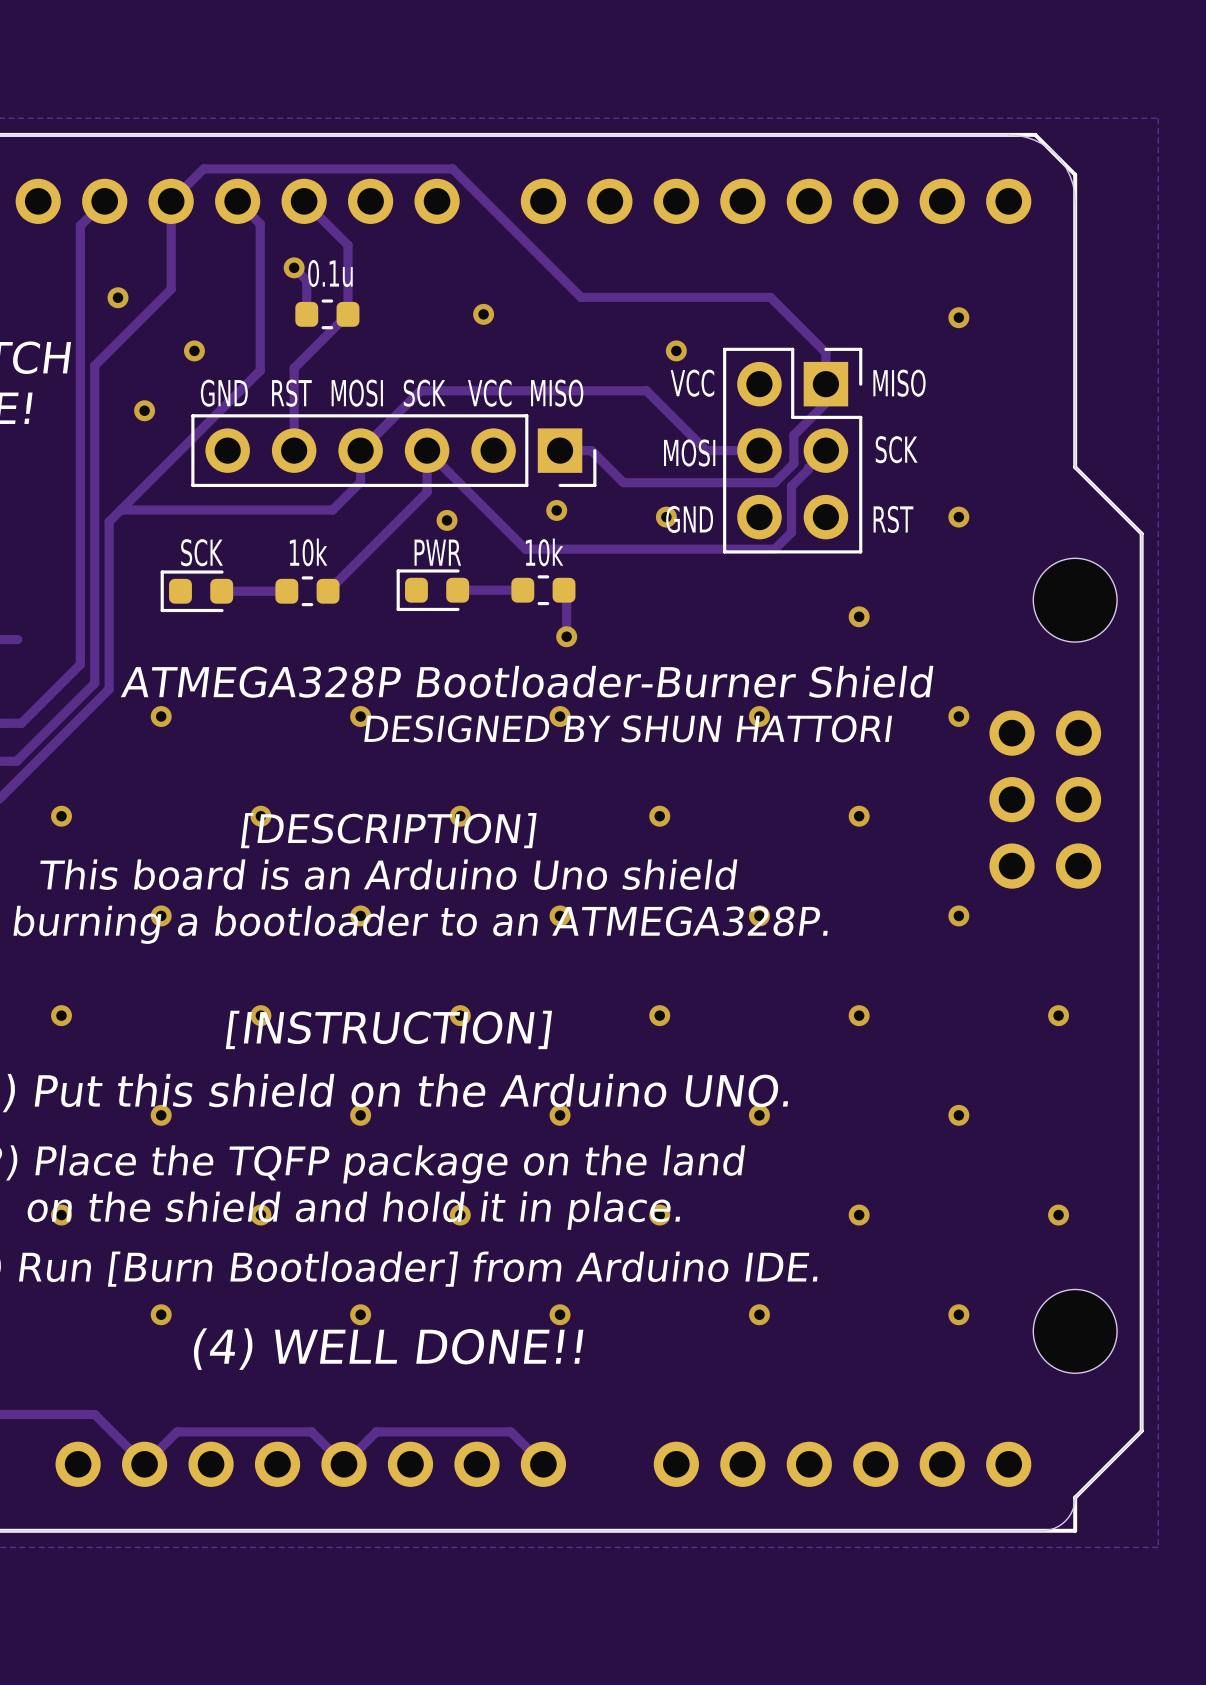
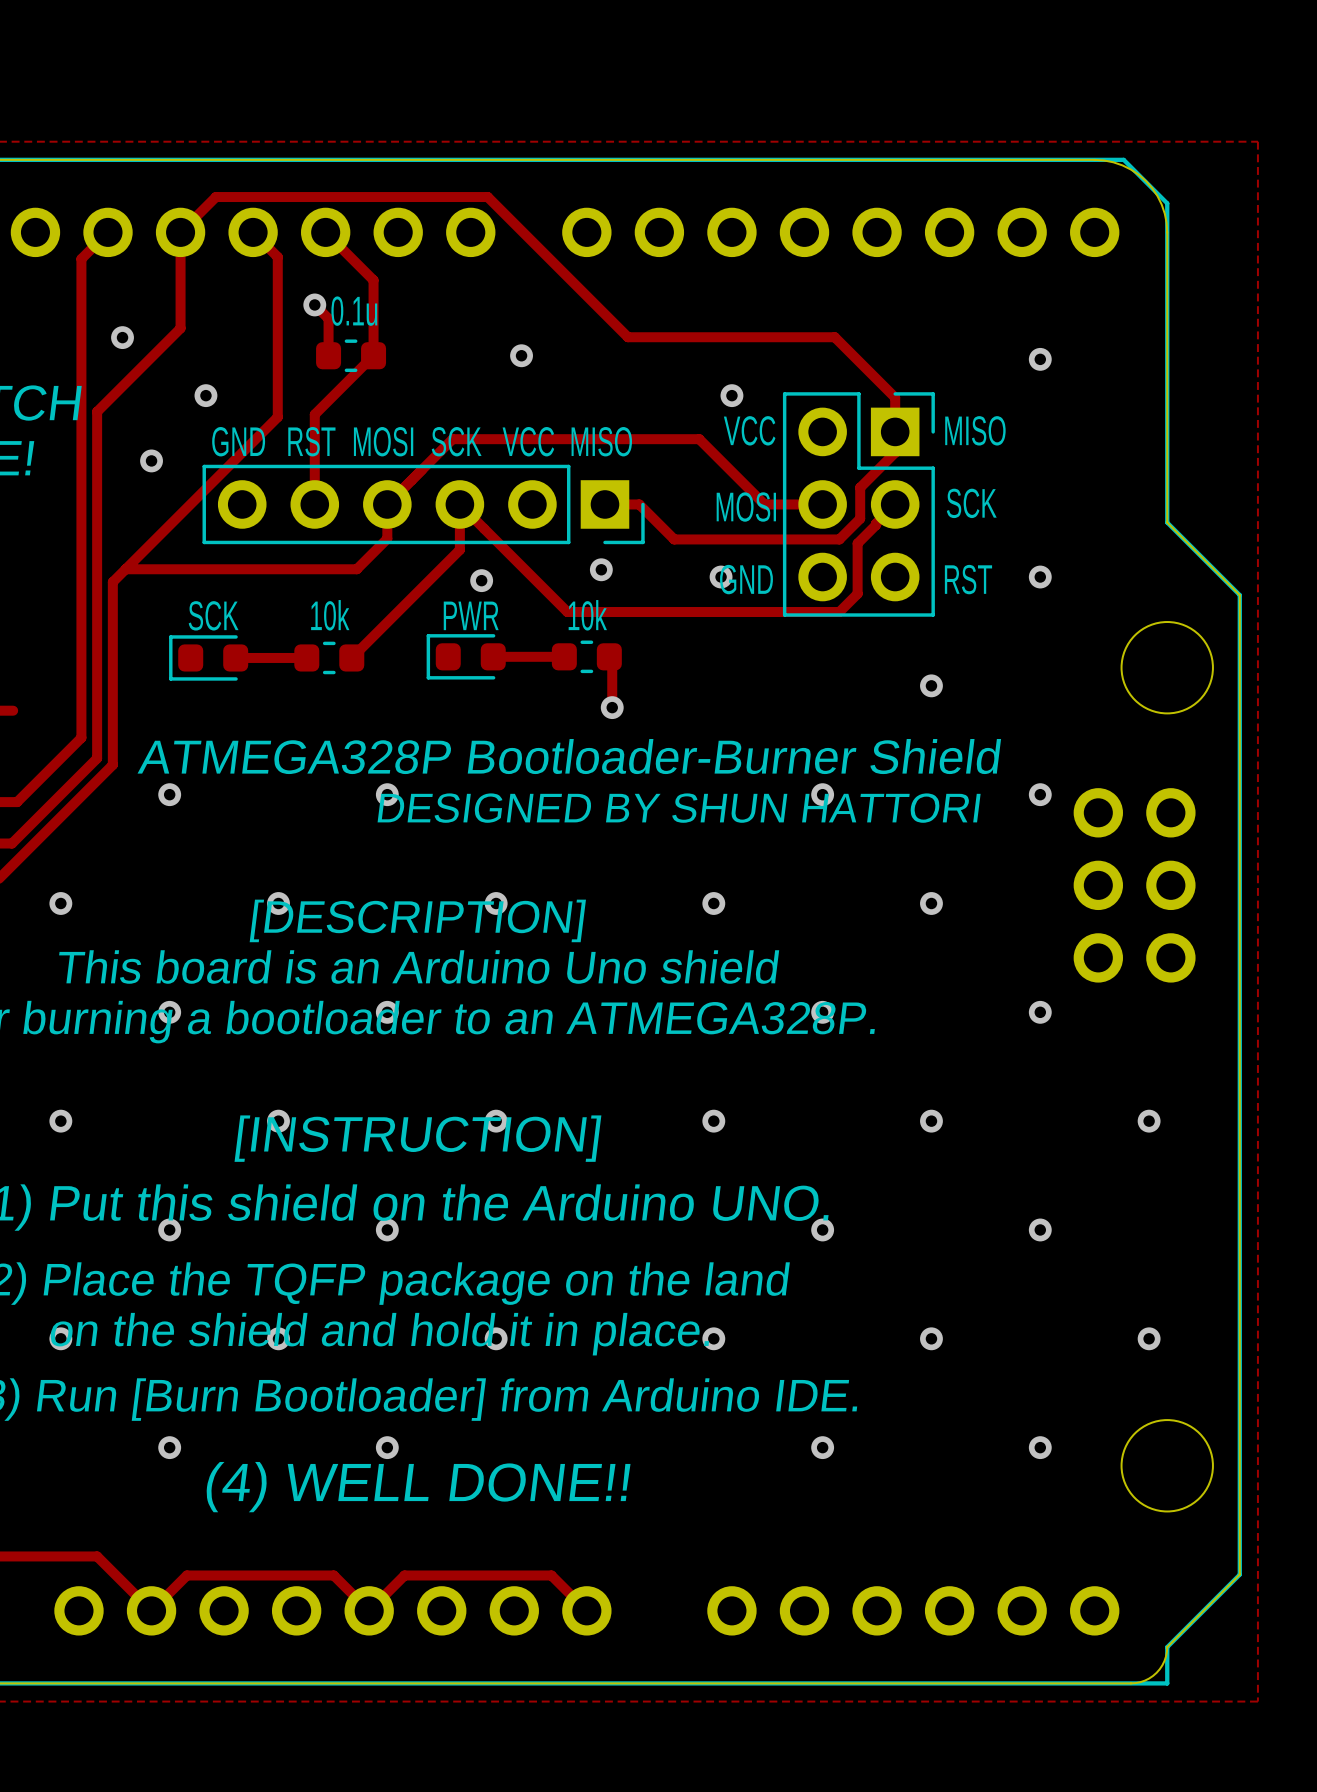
via: (560, 716) -> none
via: (560, 915) -> none
via: (560, 1115) -> none
via: (560, 1314) -> none

